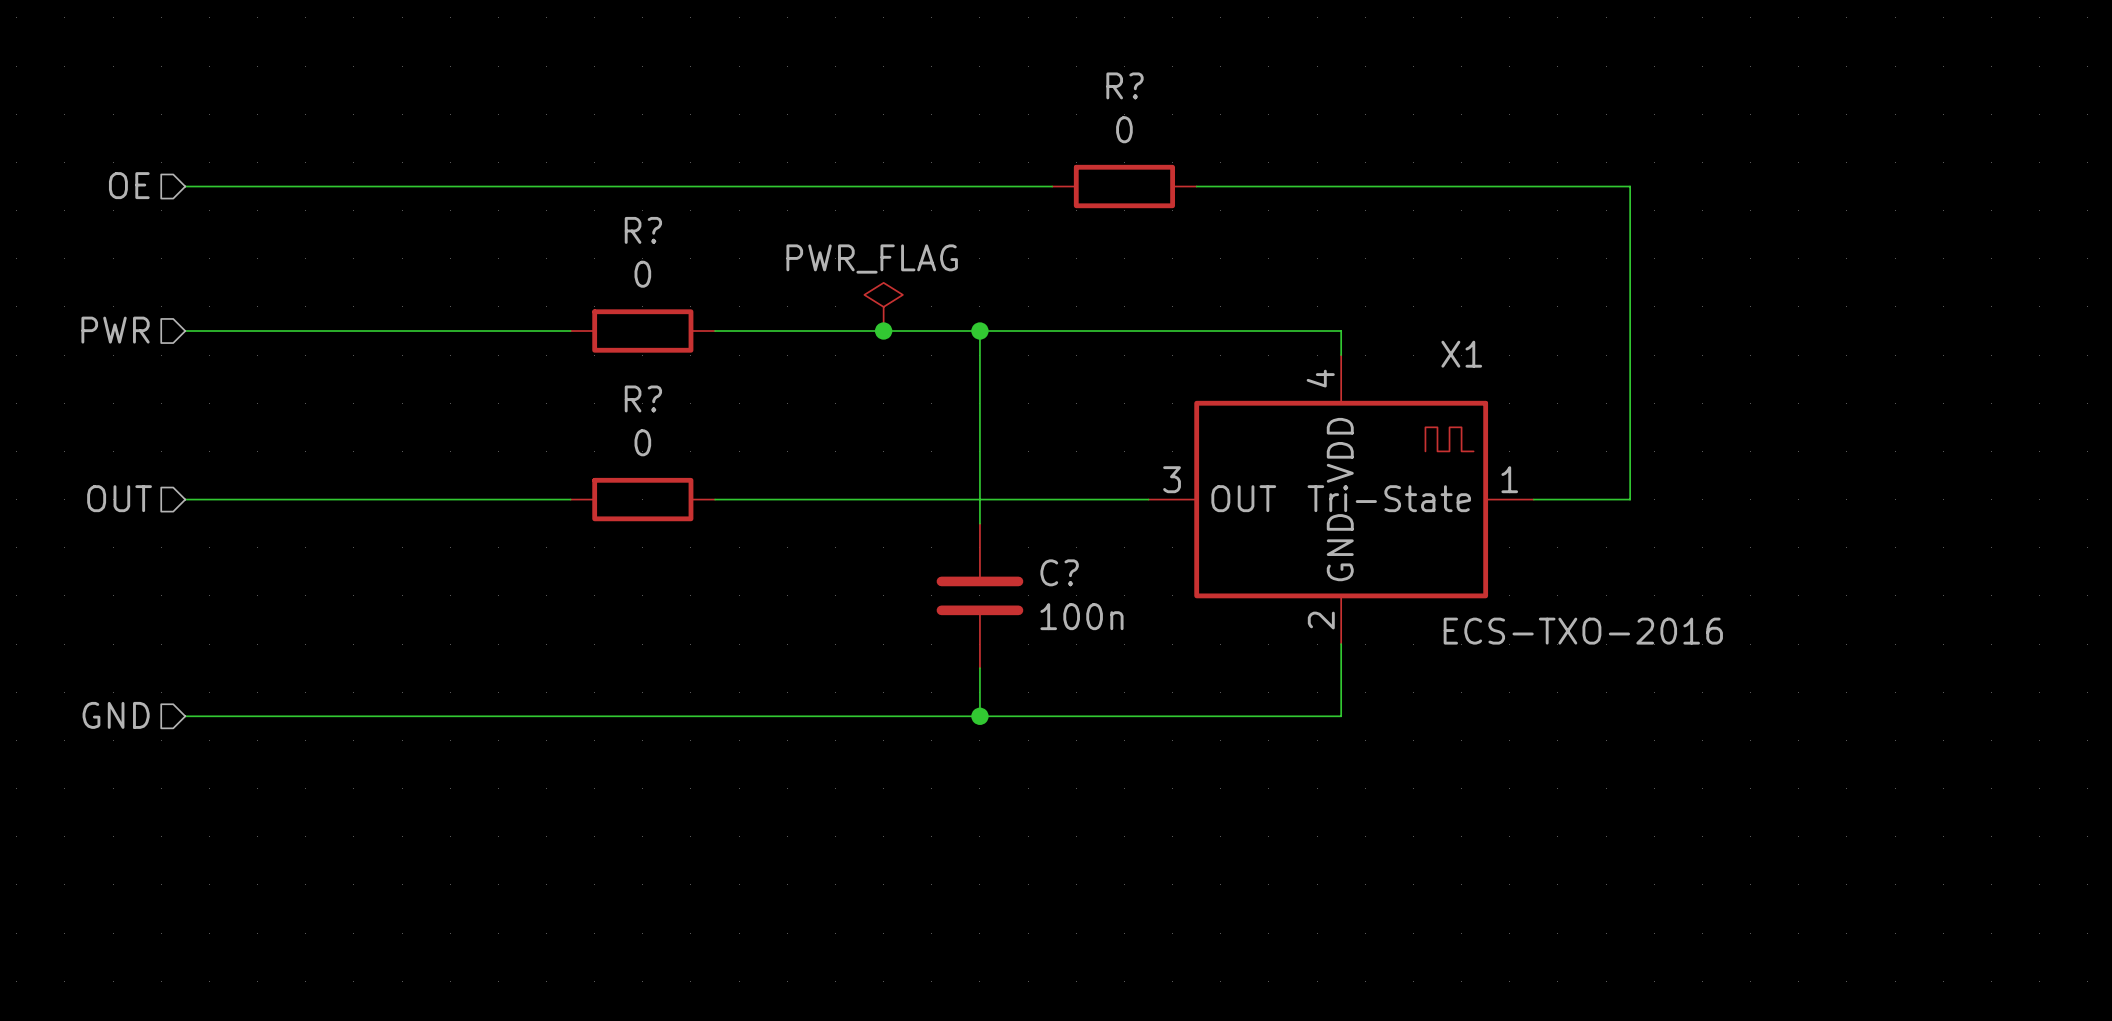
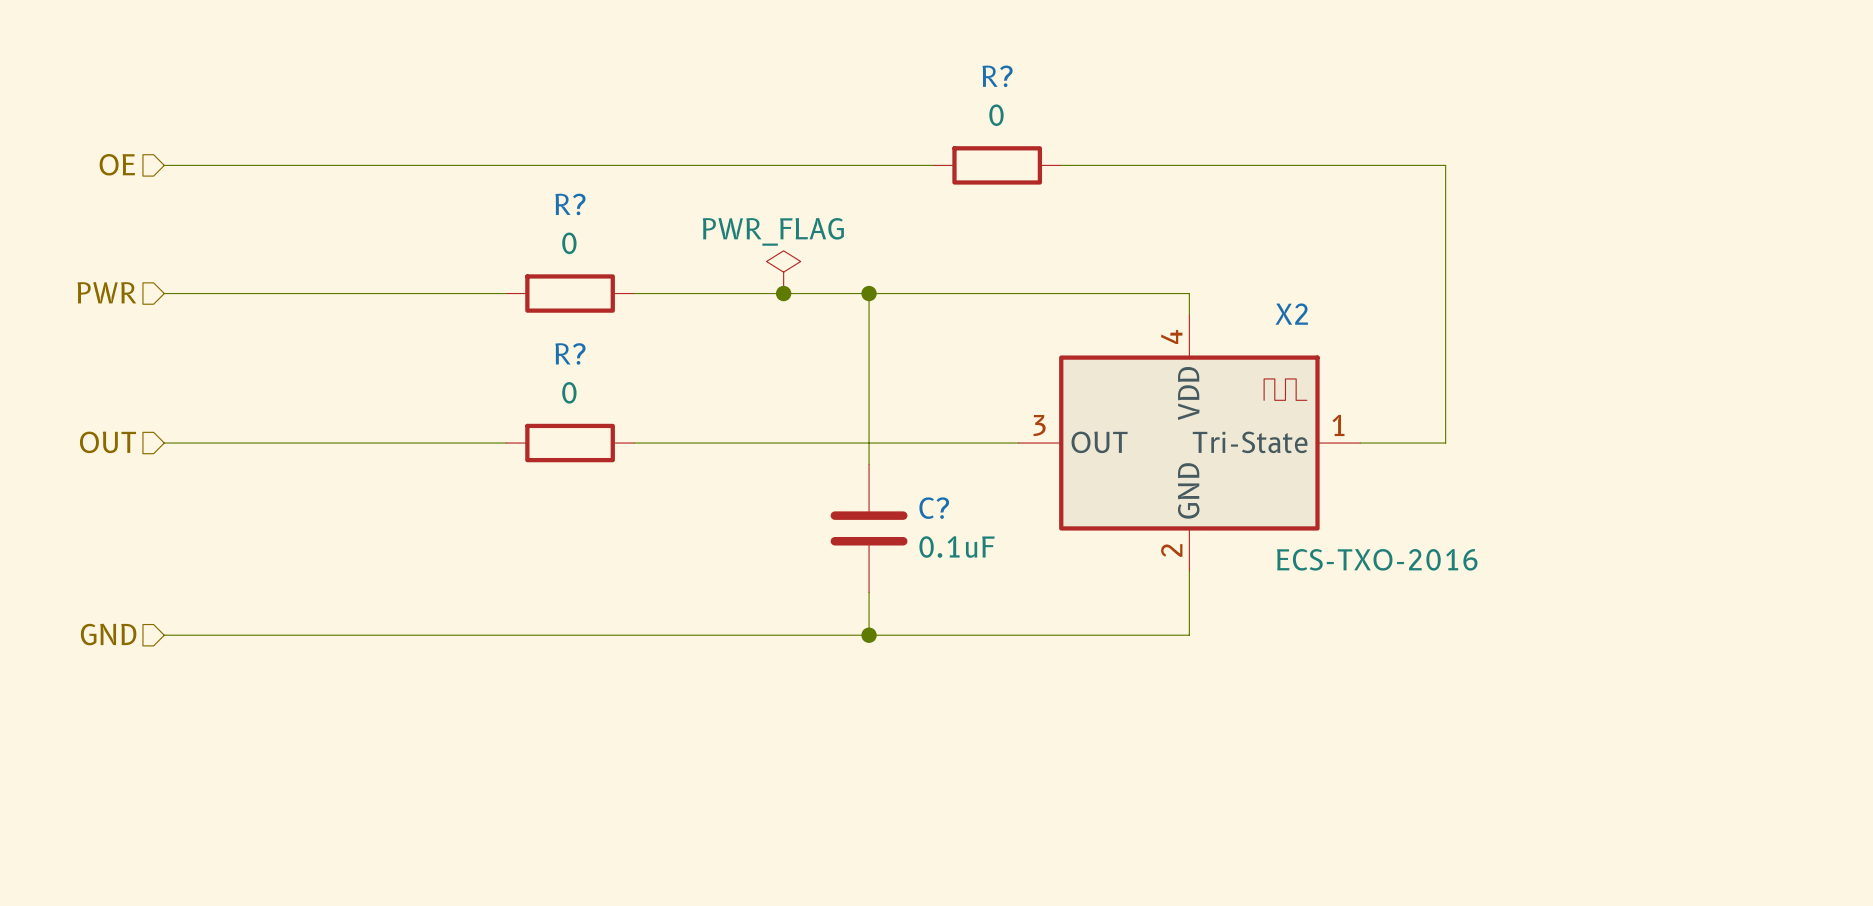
X1 name: X1 (1461, 354) -> X2 (1291, 314)
C? value: 100n (1081, 616) -> 0.1uF (957, 546)

